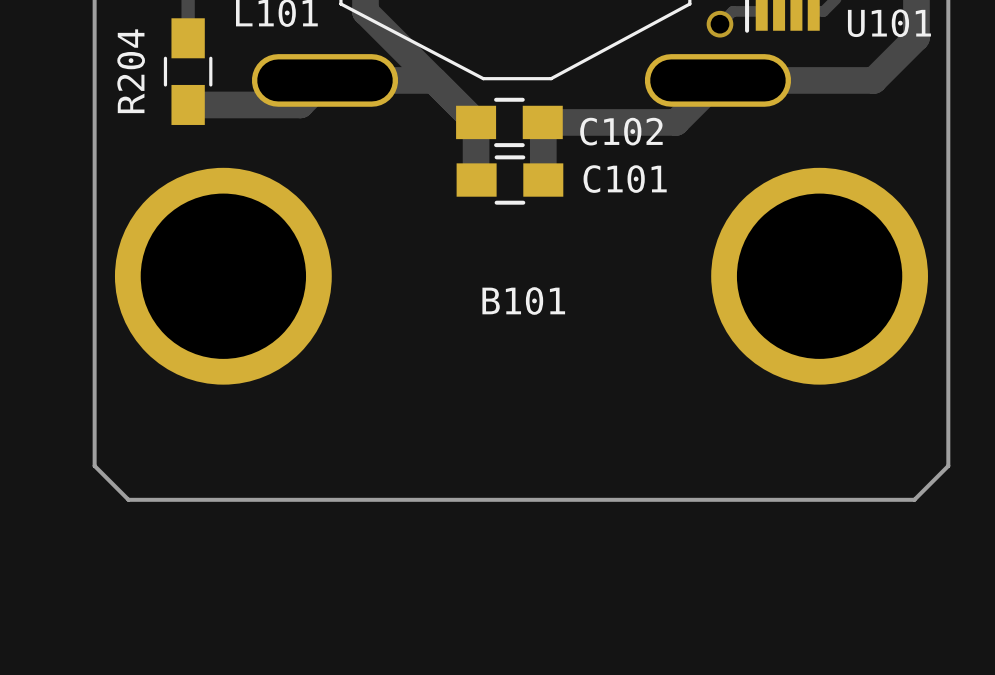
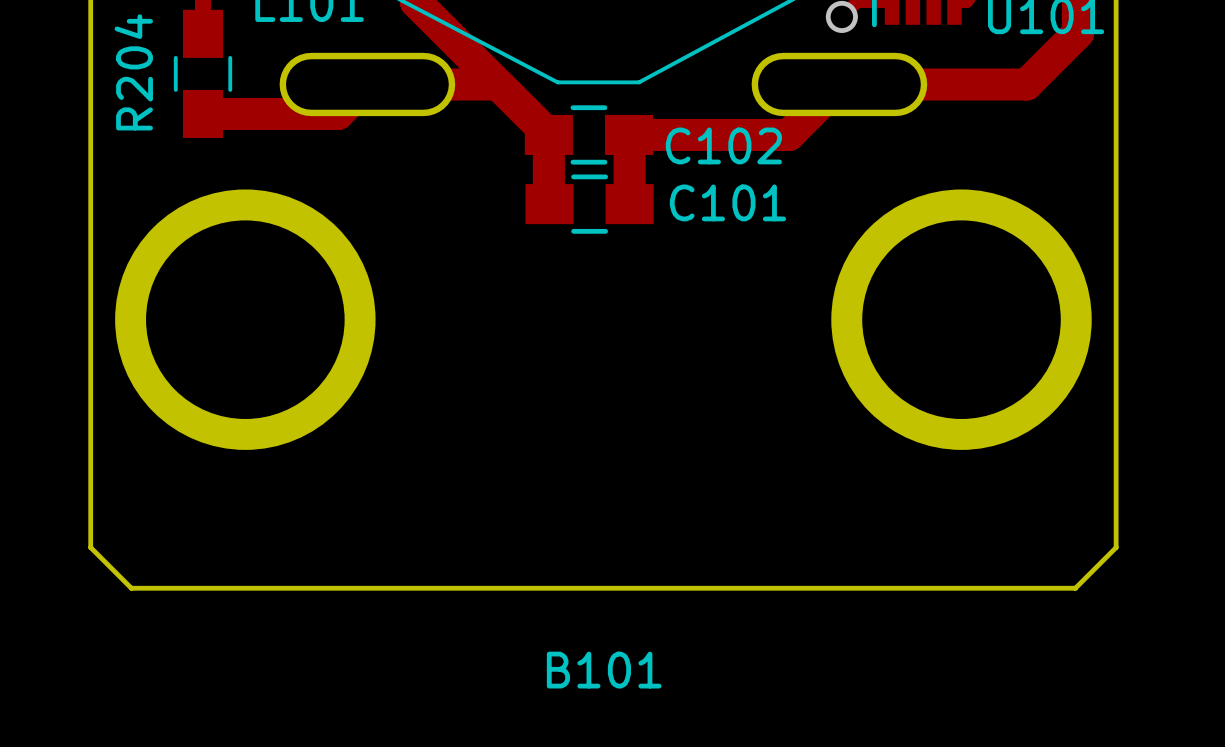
B101 name position: B101 (523, 301) -> B101 (604, 670)

